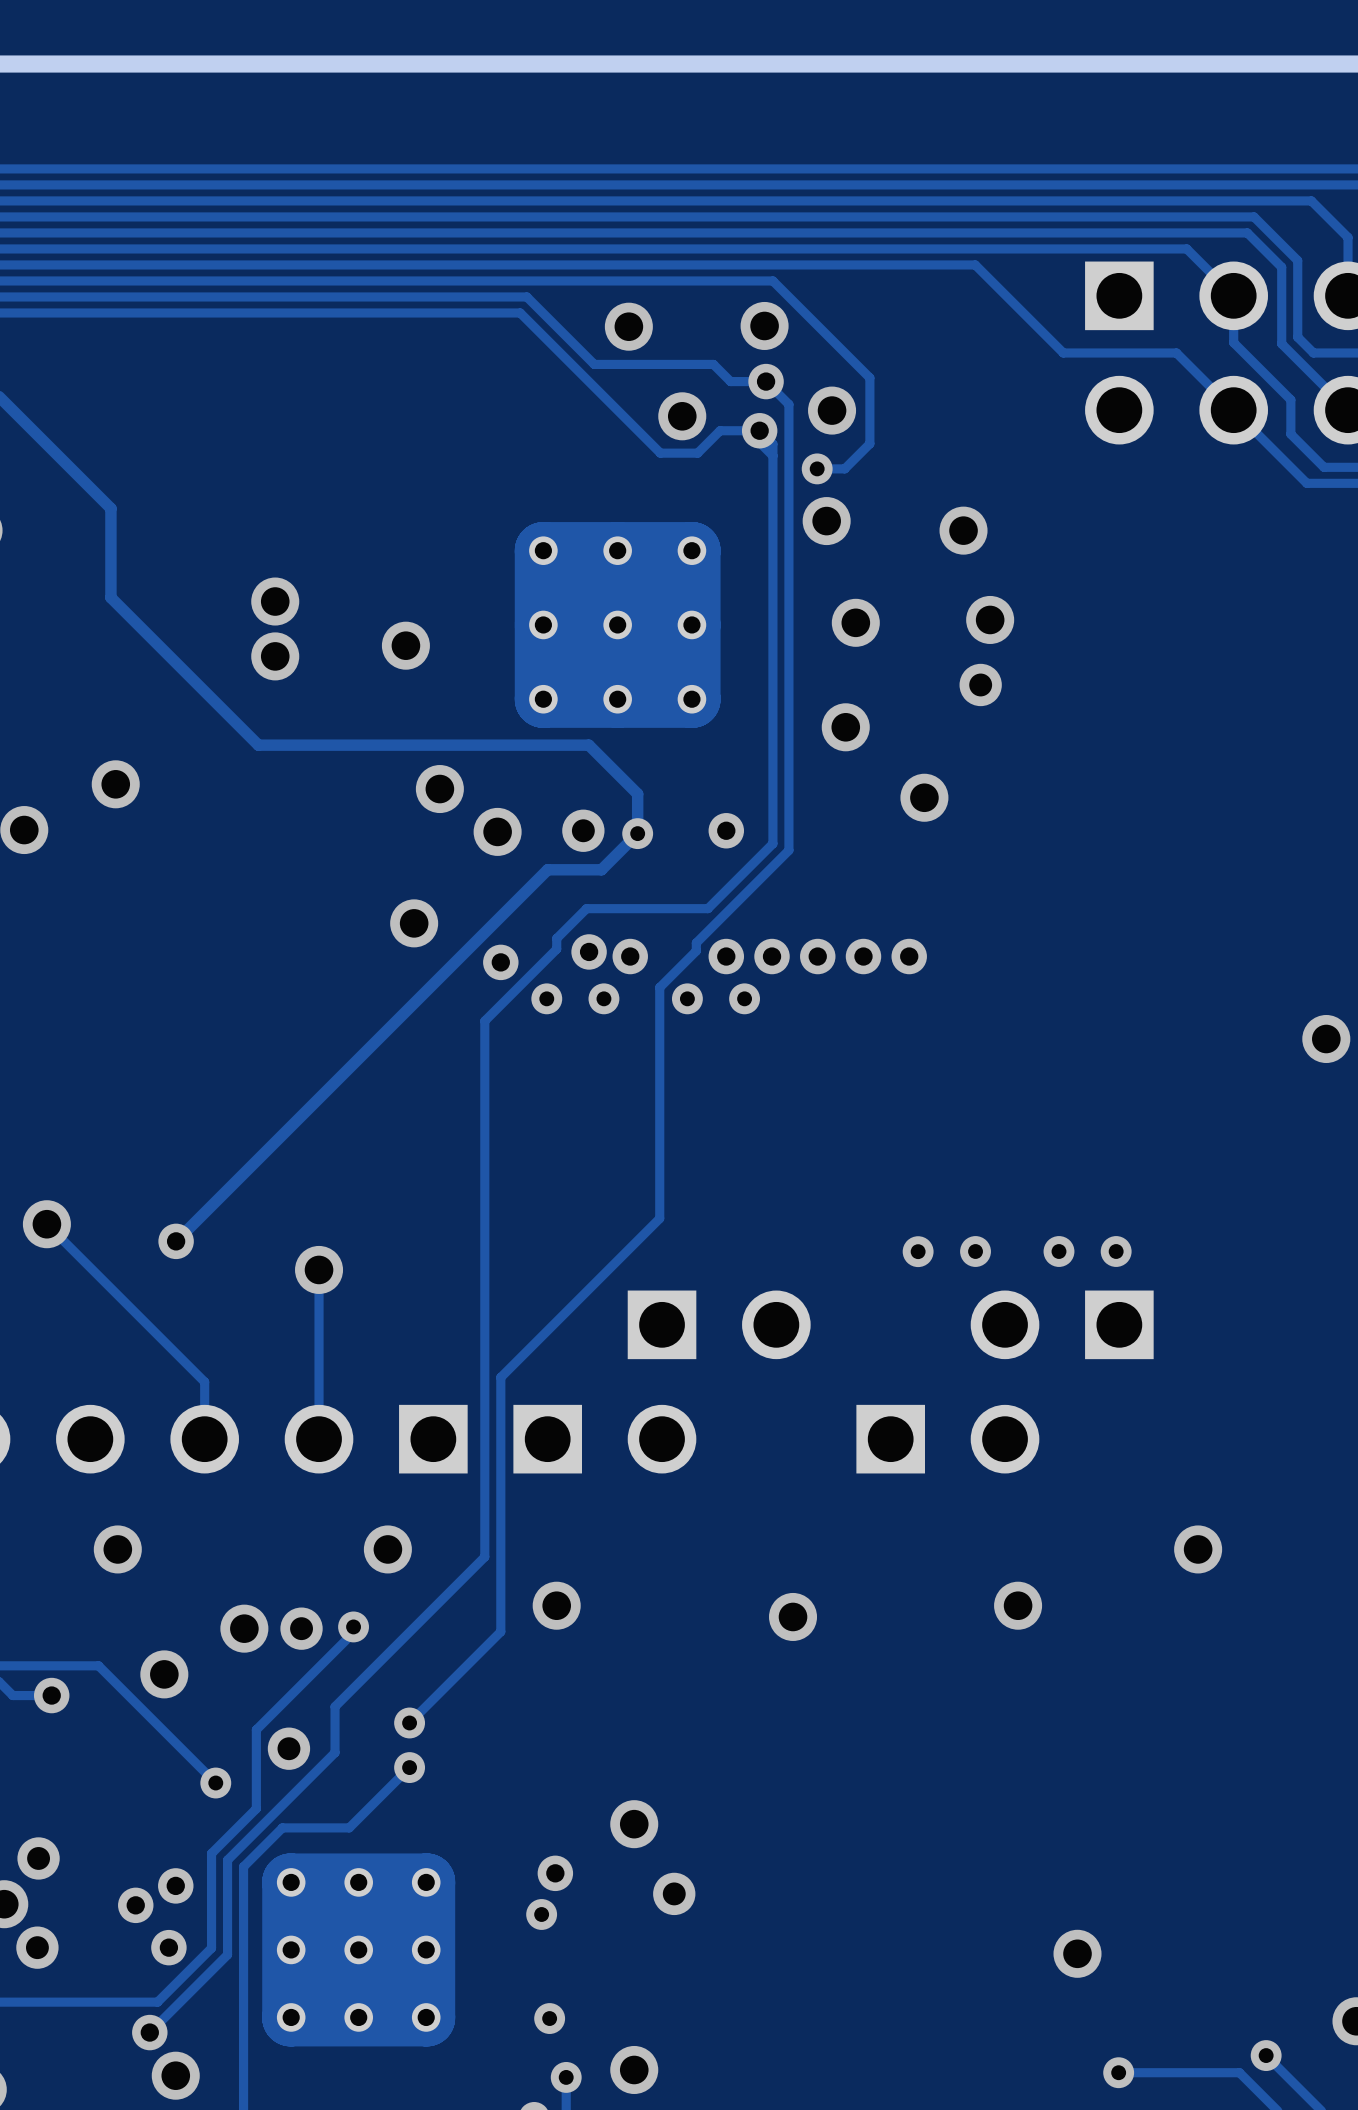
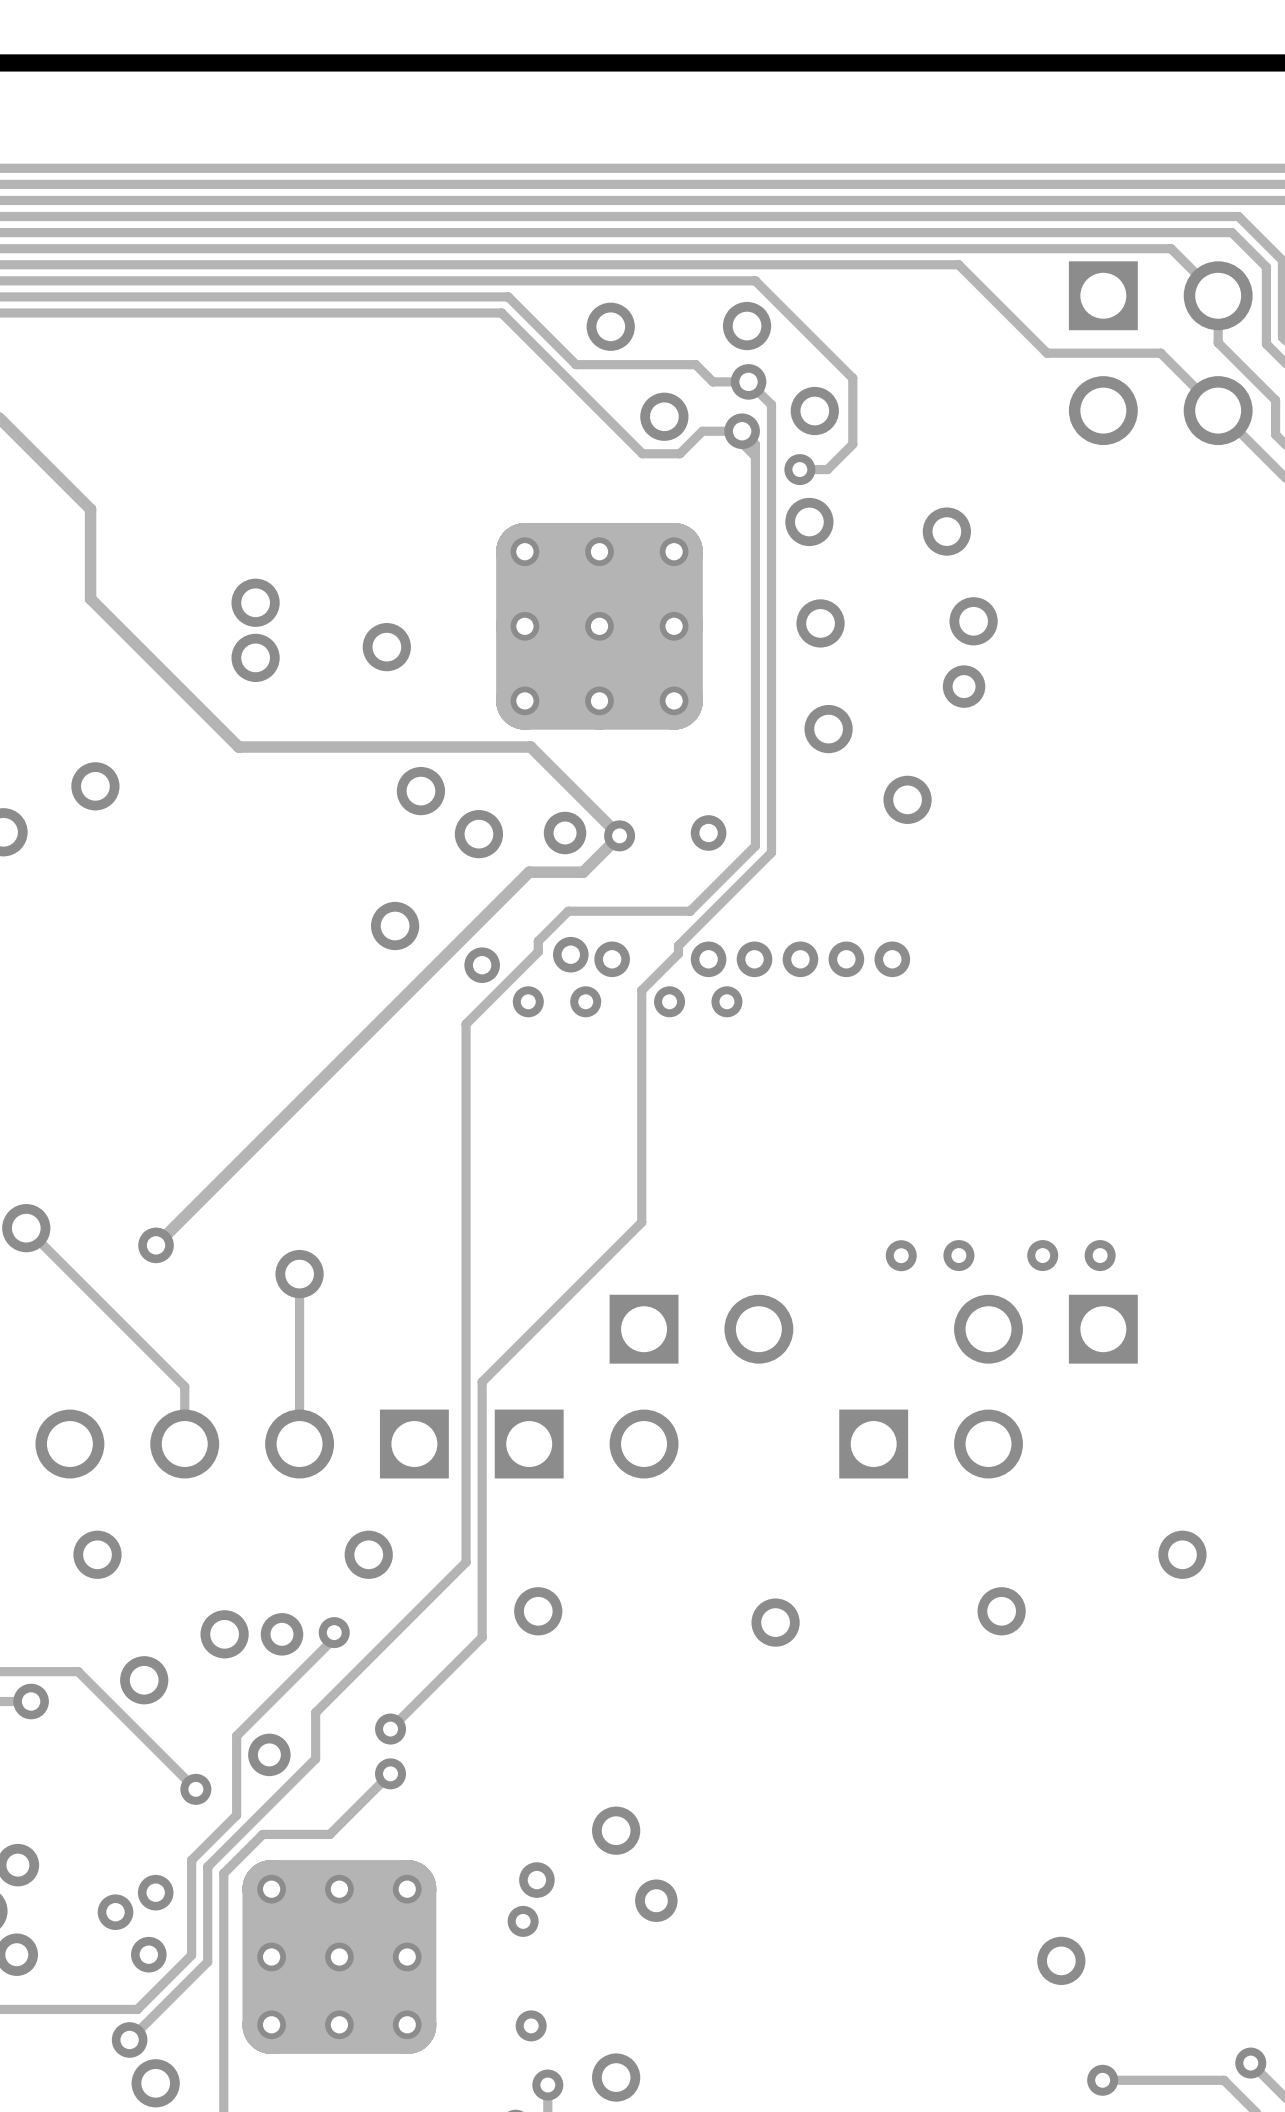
via position: (855, 622) -> (820, 623)
track: (549, 745) (588, 745) (637, 793) (637, 833) -> (530, 747) (619, 835)

